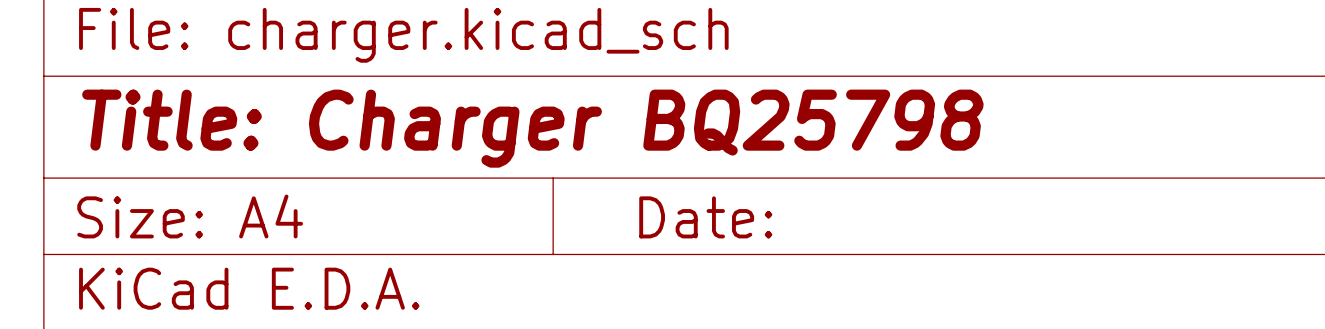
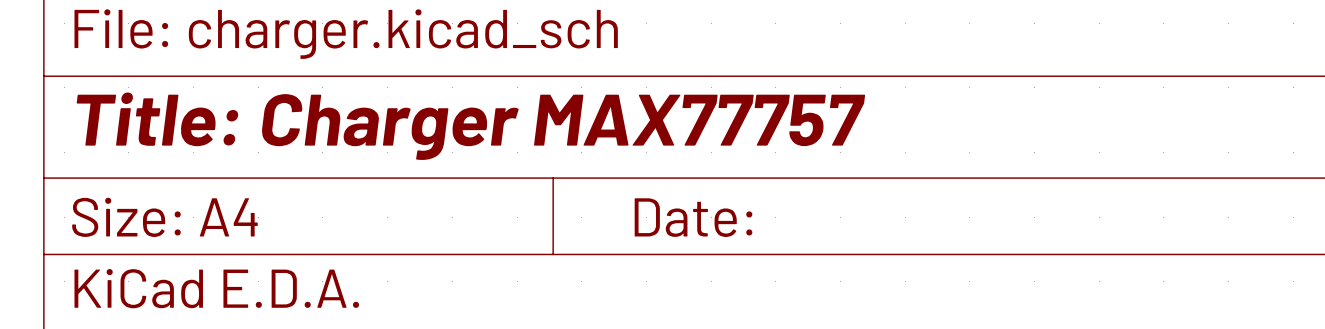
title block: Title: Charger BQ25798 (532, 128) -> Title: Charger MAX77757 (470, 126)

